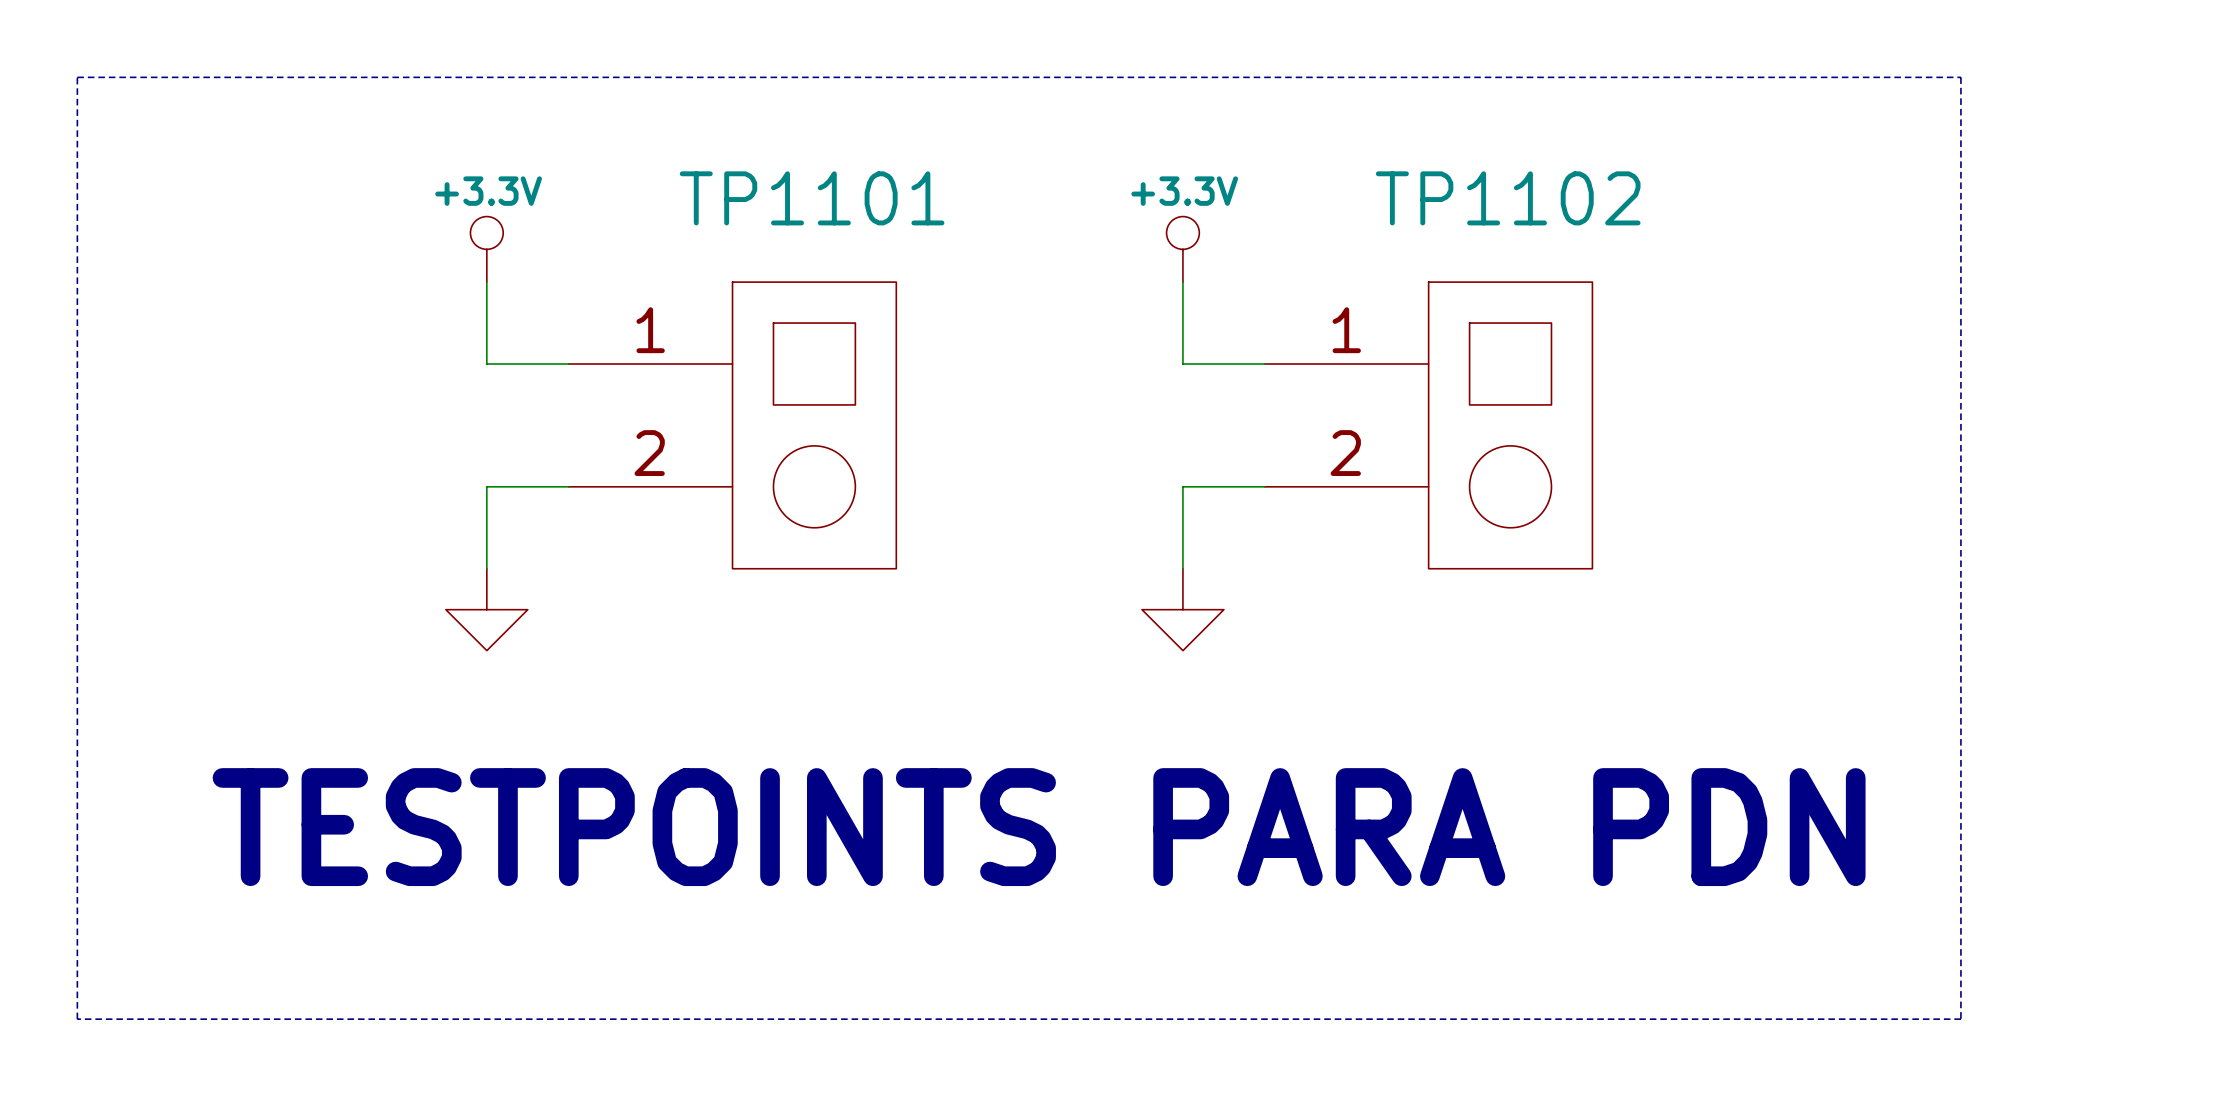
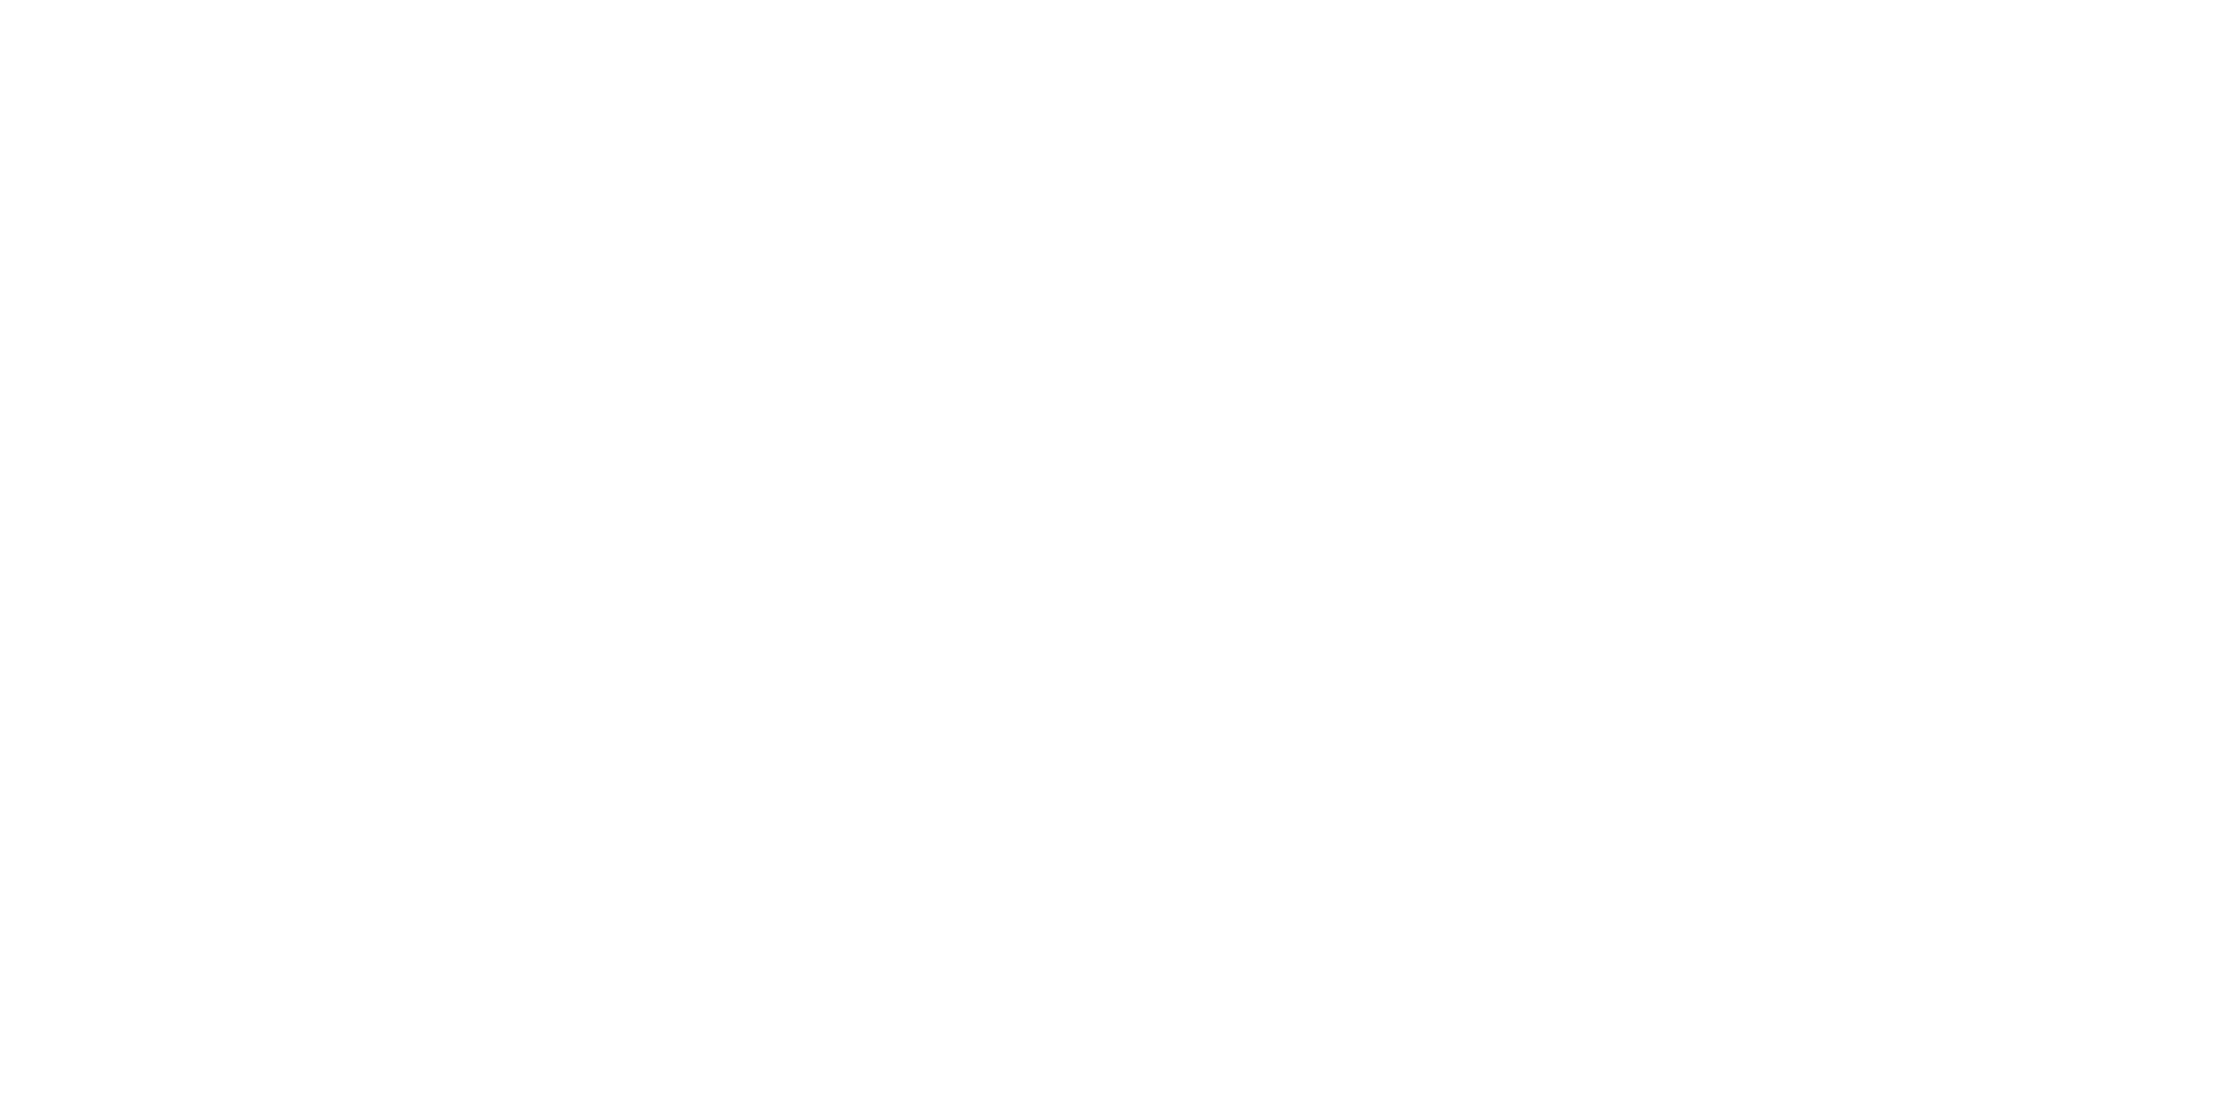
line: (77, 77) (1960, 77) (1960, 1019) (77, 1019) (77, 77) -> none
power symbol: +3.3V (486, 249) -> none
power symbol: +3.3V (1182, 249) -> none
wire: (486, 282) (486, 363) (568, 363) -> none
wire: (1182, 282) (1182, 363) (1264, 363) -> none
TP1101: (732, 425) -> none
TP1102: (1428, 425) -> none
wire: (568, 486) (486, 486) (486, 568) -> none
wire: (1264, 486) (1182, 486) (1182, 568) -> none
power symbol: (486, 609) -> none
power symbol: (1182, 609) -> none
text: TESTPOINTS PARA PDN (1039, 827) -> none

